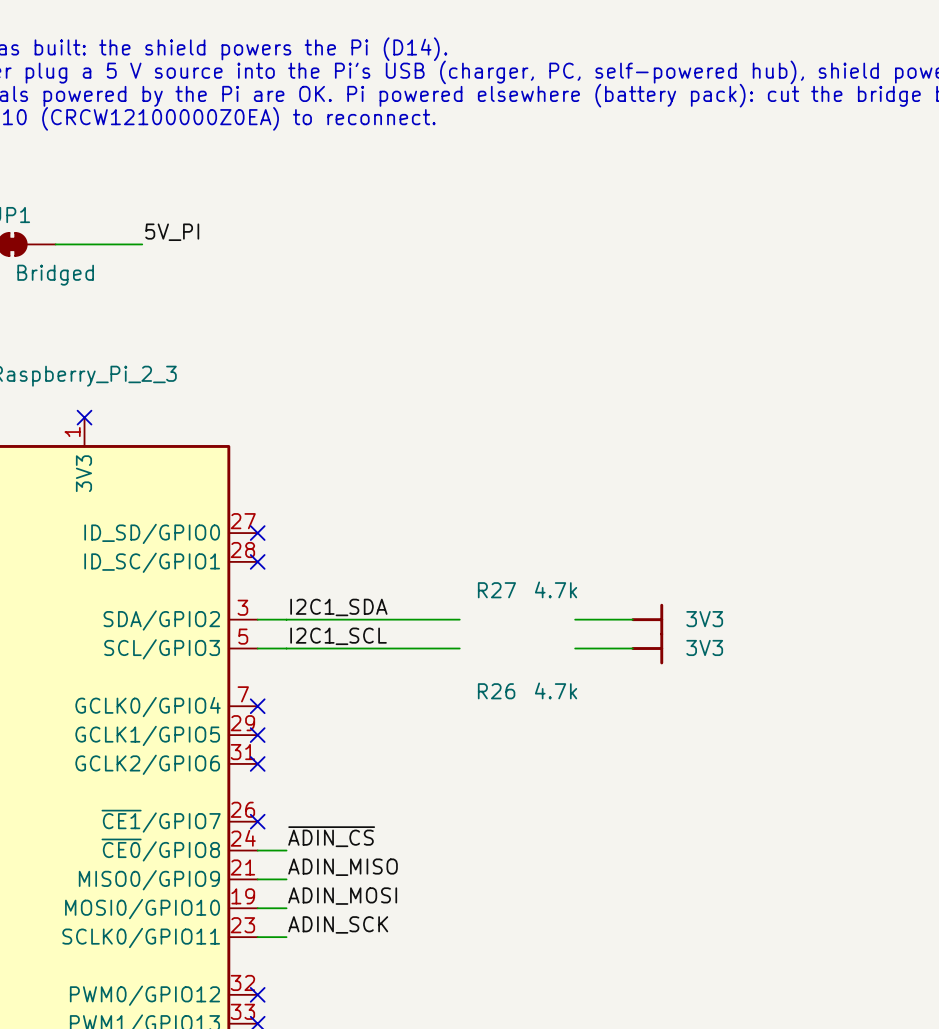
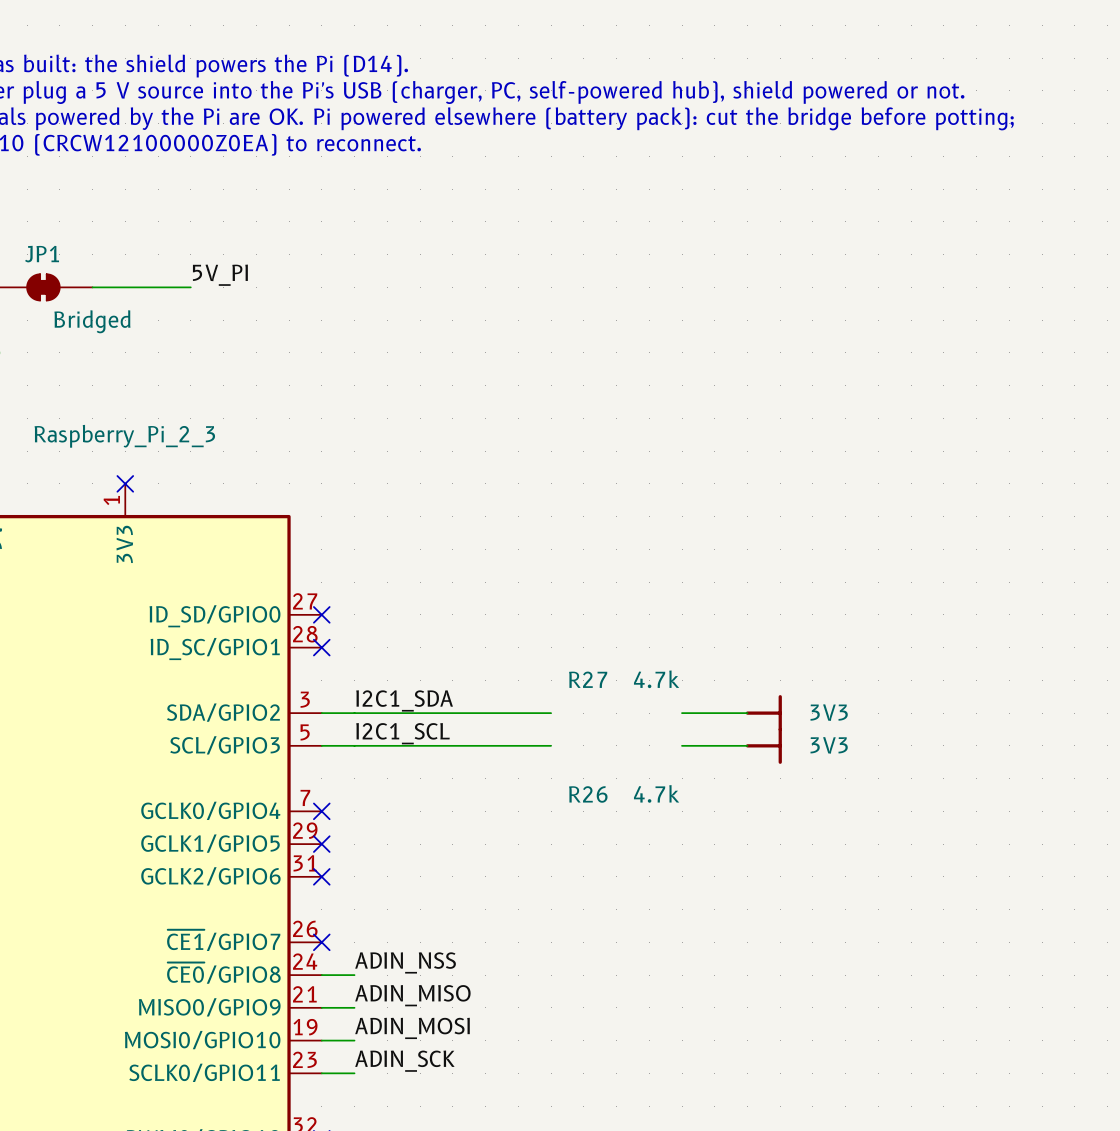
label: ~{ADIN_CS} (331, 836) -> ADIN_NSS (405, 962)

